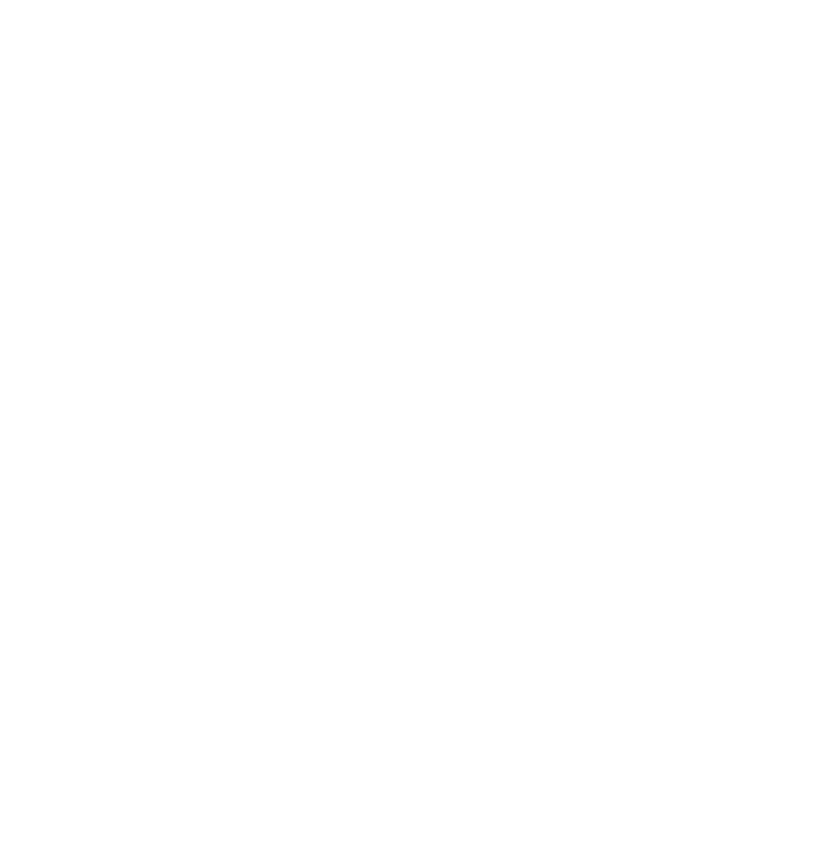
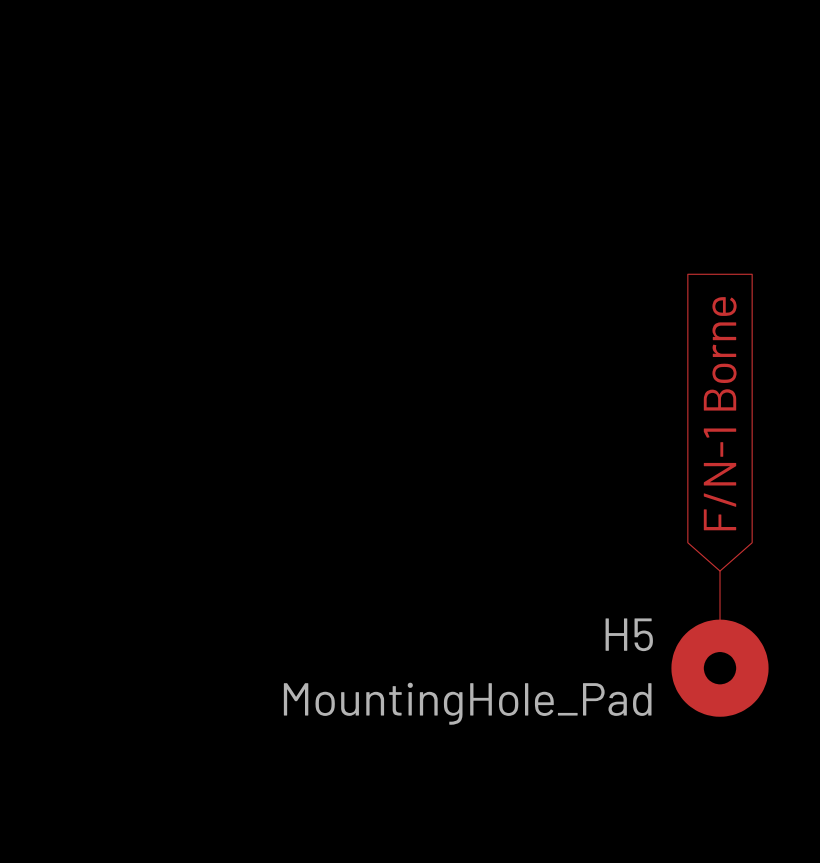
global label: none -> F/N-1 Borne (720, 413)
H5: none -> MountingHole_Pad (720, 643)

